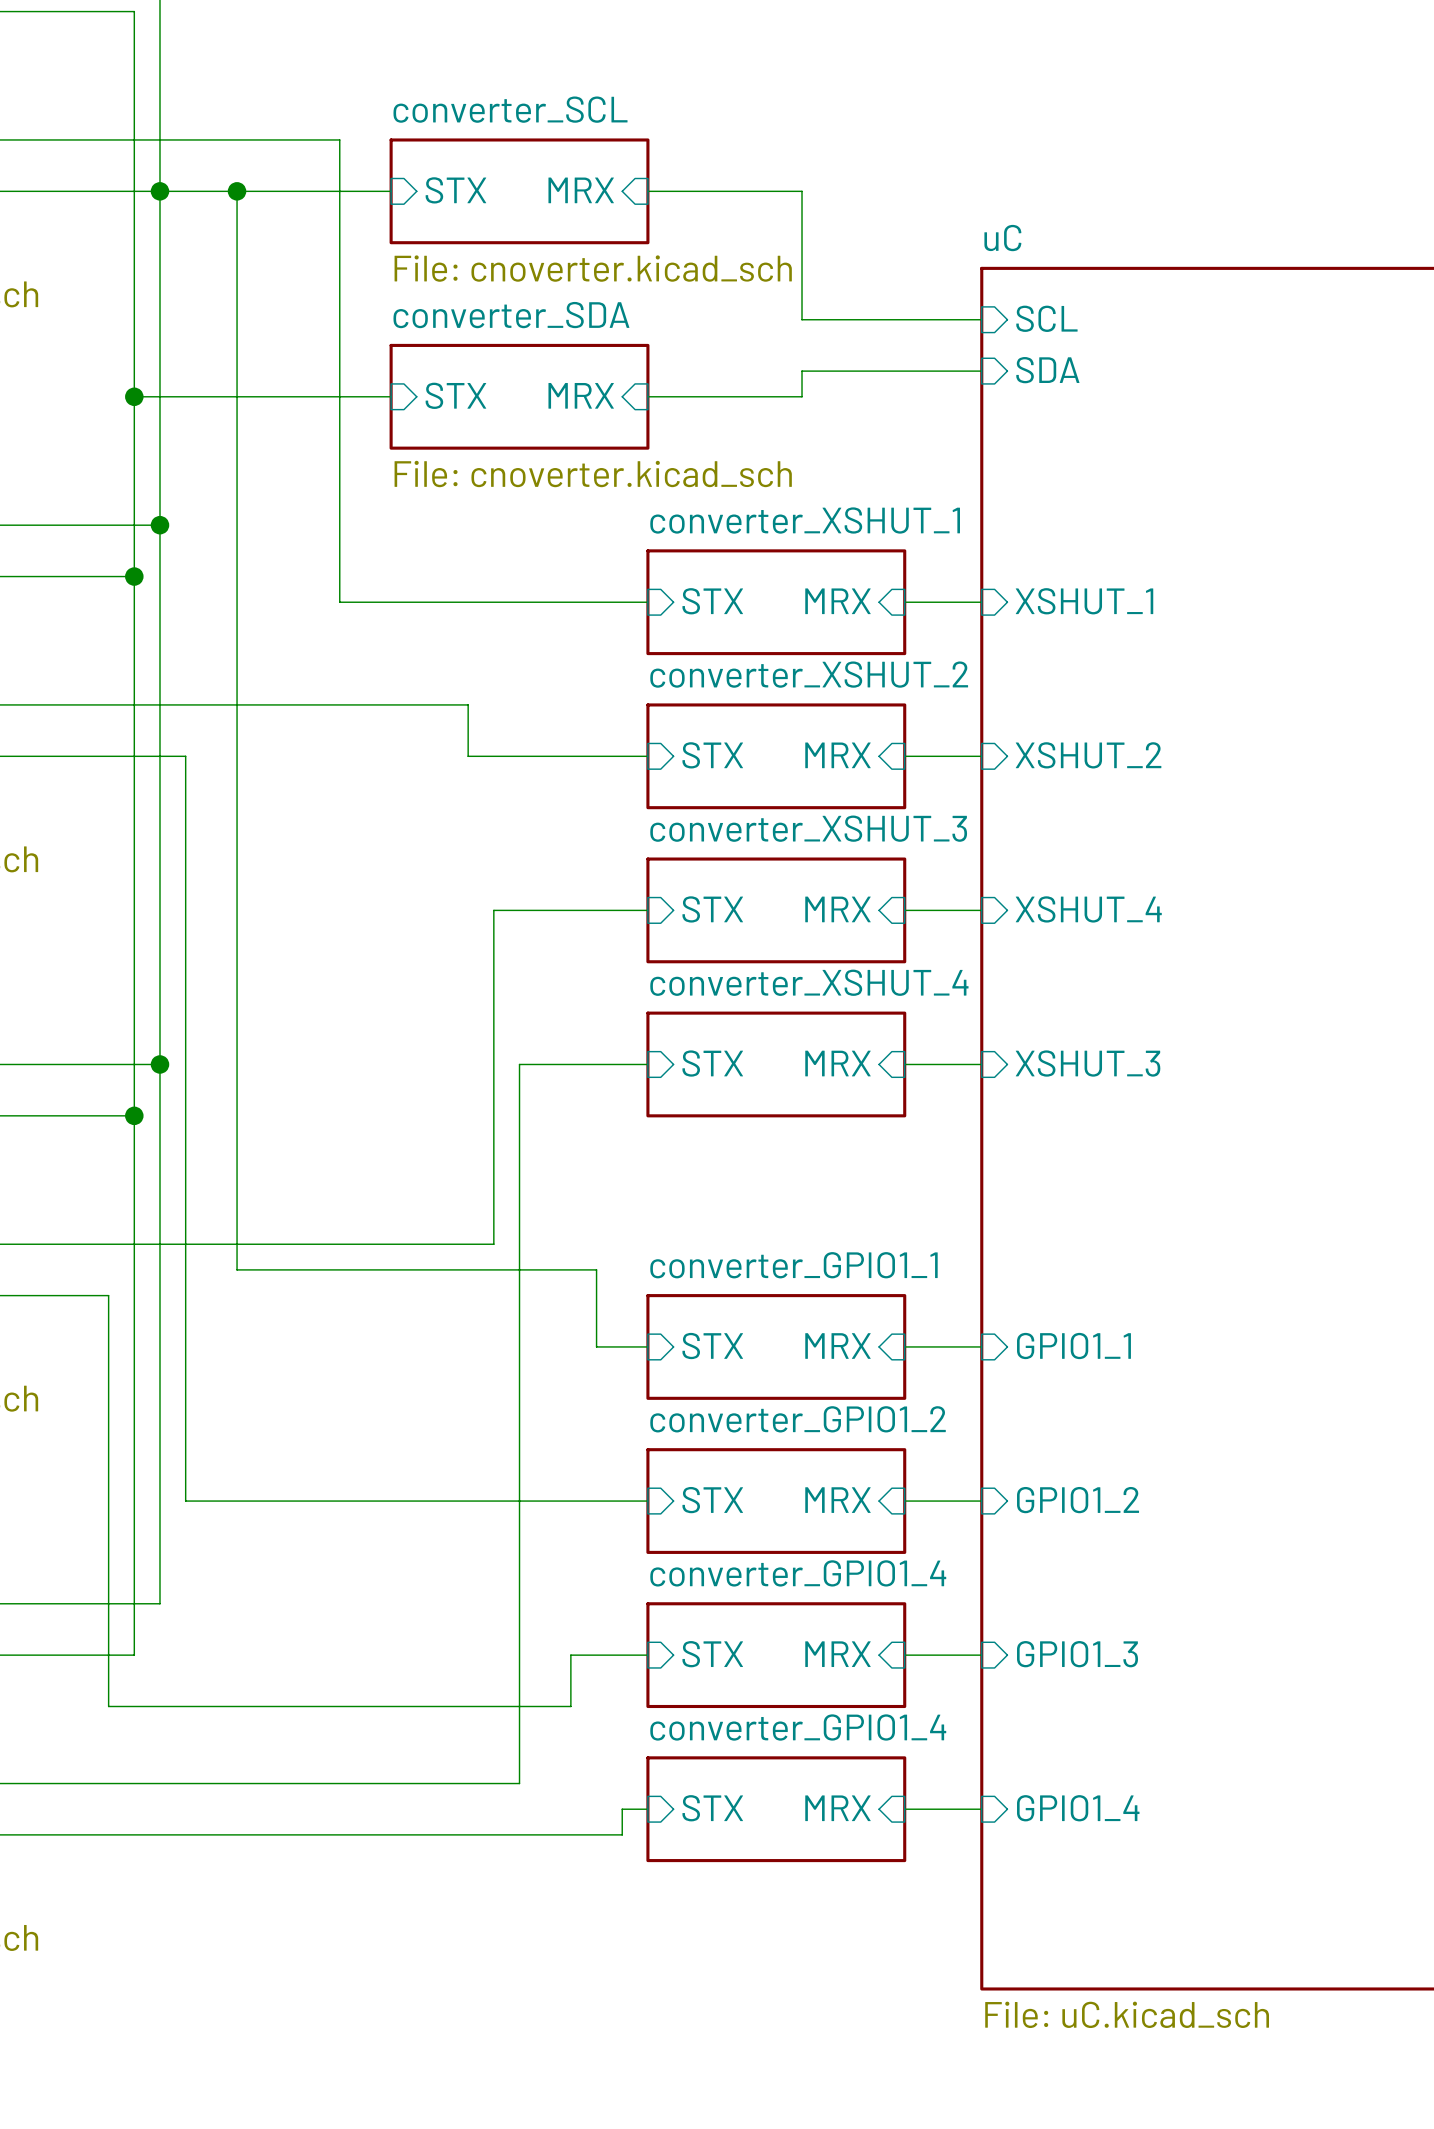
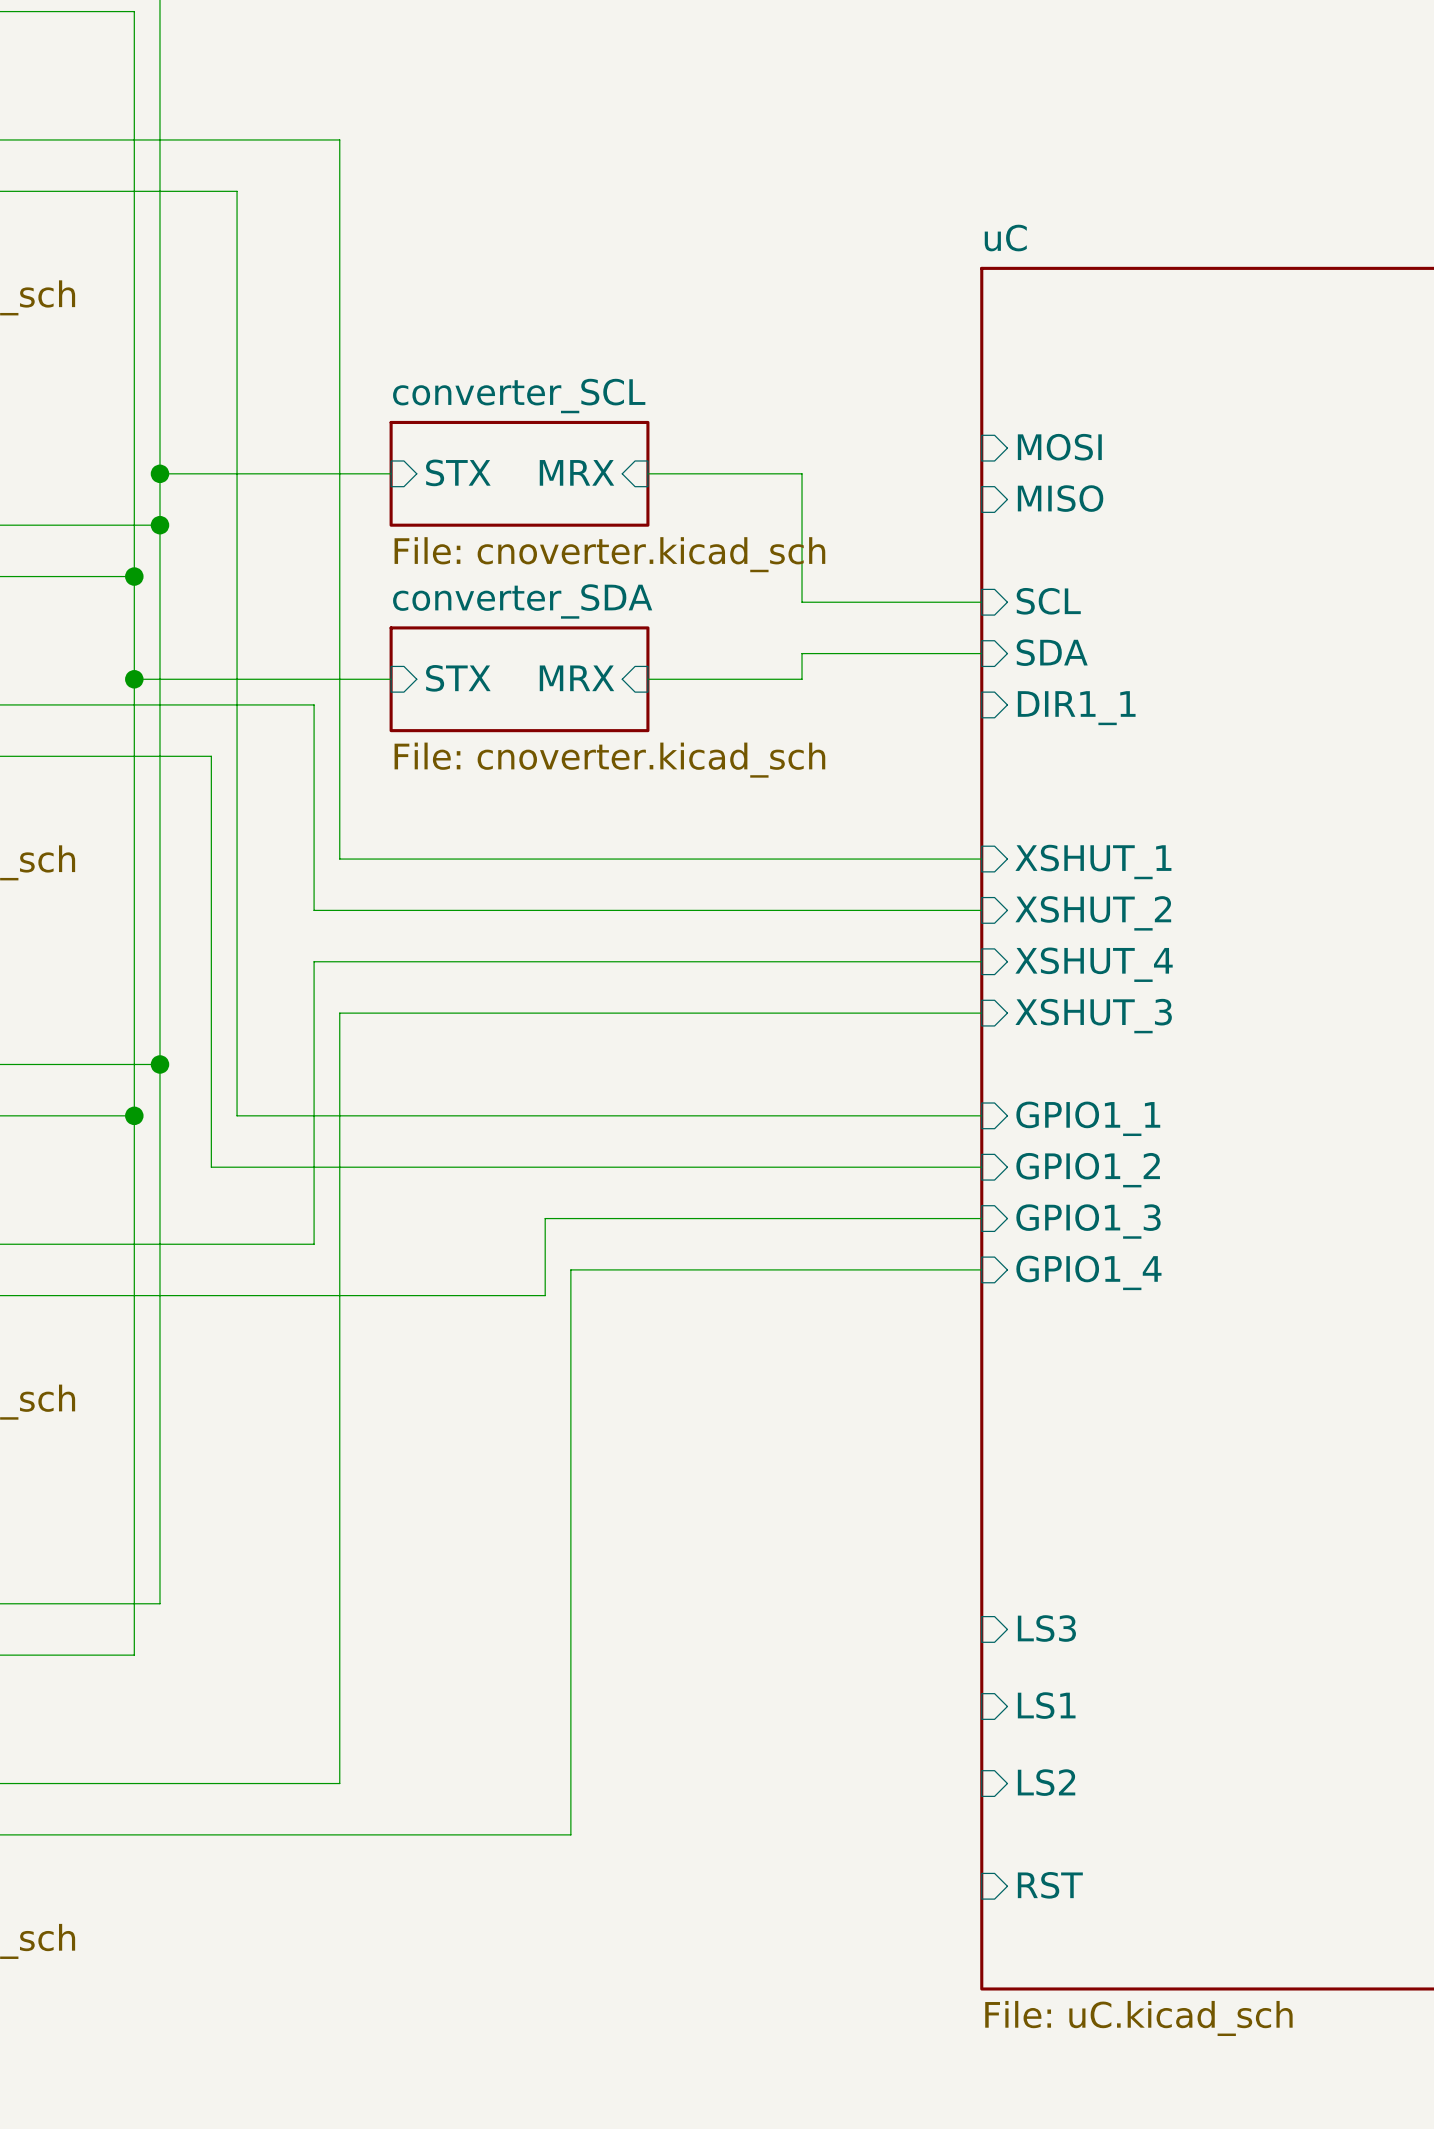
sheet pin: STX (455, 190) -> none
sheet pin: MRX (581, 190) -> none
junction: (159, 191) -> none
wire: (237, 191) (391, 191) -> none
junction: (237, 191) -> none
sheet converter_SCL position: (519, 191) -> (519, 473)
wire: (647, 191) (802, 191) (802, 319) (981, 319) -> none
sheet pin: SCL (1046, 318) -> none
sheet pin position: SDA (1047, 370) -> SDA (1052, 652)
wire: (981, 371) (802, 371) (802, 396) (647, 396) -> (981, 653) (802, 653) (802, 679) (647, 679)
sheet pin position: STX (455, 395) -> STX (458, 472)
sheet pin position: MRX (581, 395) -> MRX (576, 472)
wire: (134, 396) (391, 396) -> (134, 679) (391, 679)
junction position: (134, 396) -> (159, 473)
sheet converter_SDA position: (519, 396) -> (519, 679)
sheet pin: none -> MOSI (1059, 447)
wire: none -> (159, 473) (391, 473)
wire: none -> (647, 473) (802, 473) (802, 602) (904, 602)
sheet pin: none -> MISO (1060, 498)
sheet pin: STX (712, 601) -> none
sheet pin: MRX (837, 601) -> none
sheet pin: XSHUT_1 (1084, 601) -> SCL (1048, 601)
wire: (339, 602) (647, 602) -> (339, 602) (339, 859) (981, 859)
sheet converter_XSHUT_1: (776, 602) -> none
sheet pin: none -> STX (458, 678)
sheet pin: none -> MRX (576, 678)
junction: none -> (134, 679)
sheet pin: none -> DIR1_1 (1076, 708)
wire: (314, 704) (468, 704) (468, 756) (647, 756) -> (314, 704) (314, 910) (493, 910)
sheet pin: STX (712, 755) -> none
sheet pin: MRX (837, 755) -> none
sheet pin: XSHUT_2 (1088, 755) -> none
wire: (185, 756) (185, 1501) (647, 1501) -> (185, 756) (211, 756) (211, 1167) (981, 1167)
sheet converter_XSHUT_2: (776, 756) -> none
wire: (904, 756) (981, 756) -> none
sheet pin: none -> XSHUT_1 (1093, 861)
sheet pin: STX (712, 909) -> none
sheet pin: MRX (837, 909) -> none
sheet pin: XSHUT_4 (1088, 909) -> XSHUT_2 (1093, 913)
wire: (493, 910) (493, 1244) (314, 1244) -> (981, 961) (314, 961) (314, 1244)
wire: none -> (647, 910) (904, 910)
sheet converter_XSHUT_3: (776, 910) -> none
sheet pin: none -> XSHUT_4 (1094, 964)
sheet pin: STX (712, 1063) -> none
sheet pin: MRX (837, 1063) -> none
sheet pin position: XSHUT_3 (1088, 1063) -> XSHUT_3 (1093, 1016)
wire: (647, 1064) (519, 1064) (519, 1783) (339, 1783) -> (981, 1013) (339, 1013) (339, 1783)
sheet converter_XSHUT_4: (776, 1064) -> none
wire: (904, 1064) (981, 1064) -> none
wire: (237, 1115) (237, 1269) (570, 1269) -> (237, 1115) (981, 1115)
sheet pin: none -> GPIO1_4 (1088, 1272)
wire: (596, 1269) (596, 1346) (647, 1346) -> (596, 1269) (981, 1269)
wire: (108, 1295) (108, 1706) (570, 1706) -> (108, 1295) (545, 1295) (545, 1218) (981, 1218)
sheet pin: STX (712, 1346) -> none
sheet converter_GPIO1_1: (776, 1346) -> none
sheet pin: MRX (837, 1346) -> none
wire: (904, 1346) (981, 1346) -> none
sheet pin position: GPIO1_1 (1073, 1346) -> GPIO1_1 (1088, 1118)
sheet pin: STX (712, 1500) -> none
sheet pin: MRX (837, 1500) -> none
sheet pin position: GPIO1_2 (1078, 1500) -> GPIO1_2 (1088, 1170)
sheet converter_GPIO1_2: (776, 1501) -> none
wire: (904, 1501) (981, 1501) -> none
sheet pin: none -> LS3 (1046, 1628)
sheet pin: STX (712, 1654) -> none
sheet pin: MRX (837, 1654) -> none
sheet pin position: GPIO1_3 (1077, 1654) -> GPIO1_3 (1088, 1221)
wire: (570, 1655) (647, 1655) -> (570, 1655) (570, 1269)
sheet converter_GPIO1_4: (776, 1655) -> none
wire: (904, 1655) (981, 1655) -> none
sheet pin: none -> LS1 (1046, 1705)
sheet pin: none -> LS2 (1046, 1782)
sheet pin: STX (712, 1808) -> none
sheet pin: MRX (837, 1808) -> none
sheet pin: GPIO1_4 (1078, 1808) -> none
wire: (647, 1809) (622, 1809) (622, 1834) (570, 1834) -> (570, 1706) (570, 1834)
sheet converter_GPIO1_4: (776, 1809) -> none
wire: (904, 1809) (981, 1809) -> none
sheet pin: none -> RST (1050, 1885)

